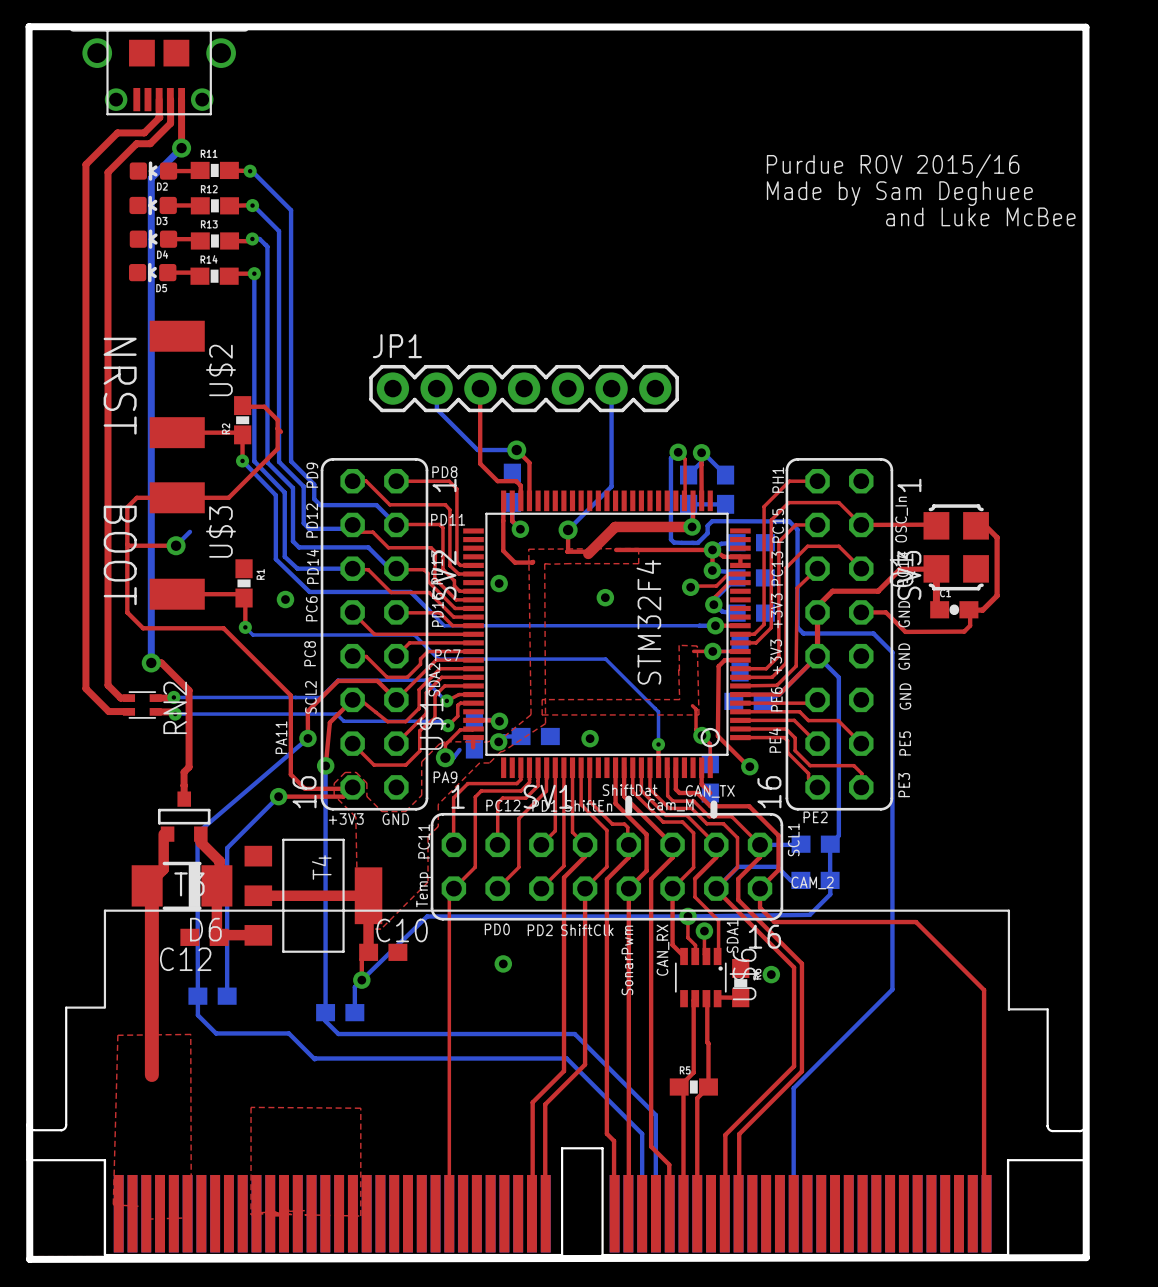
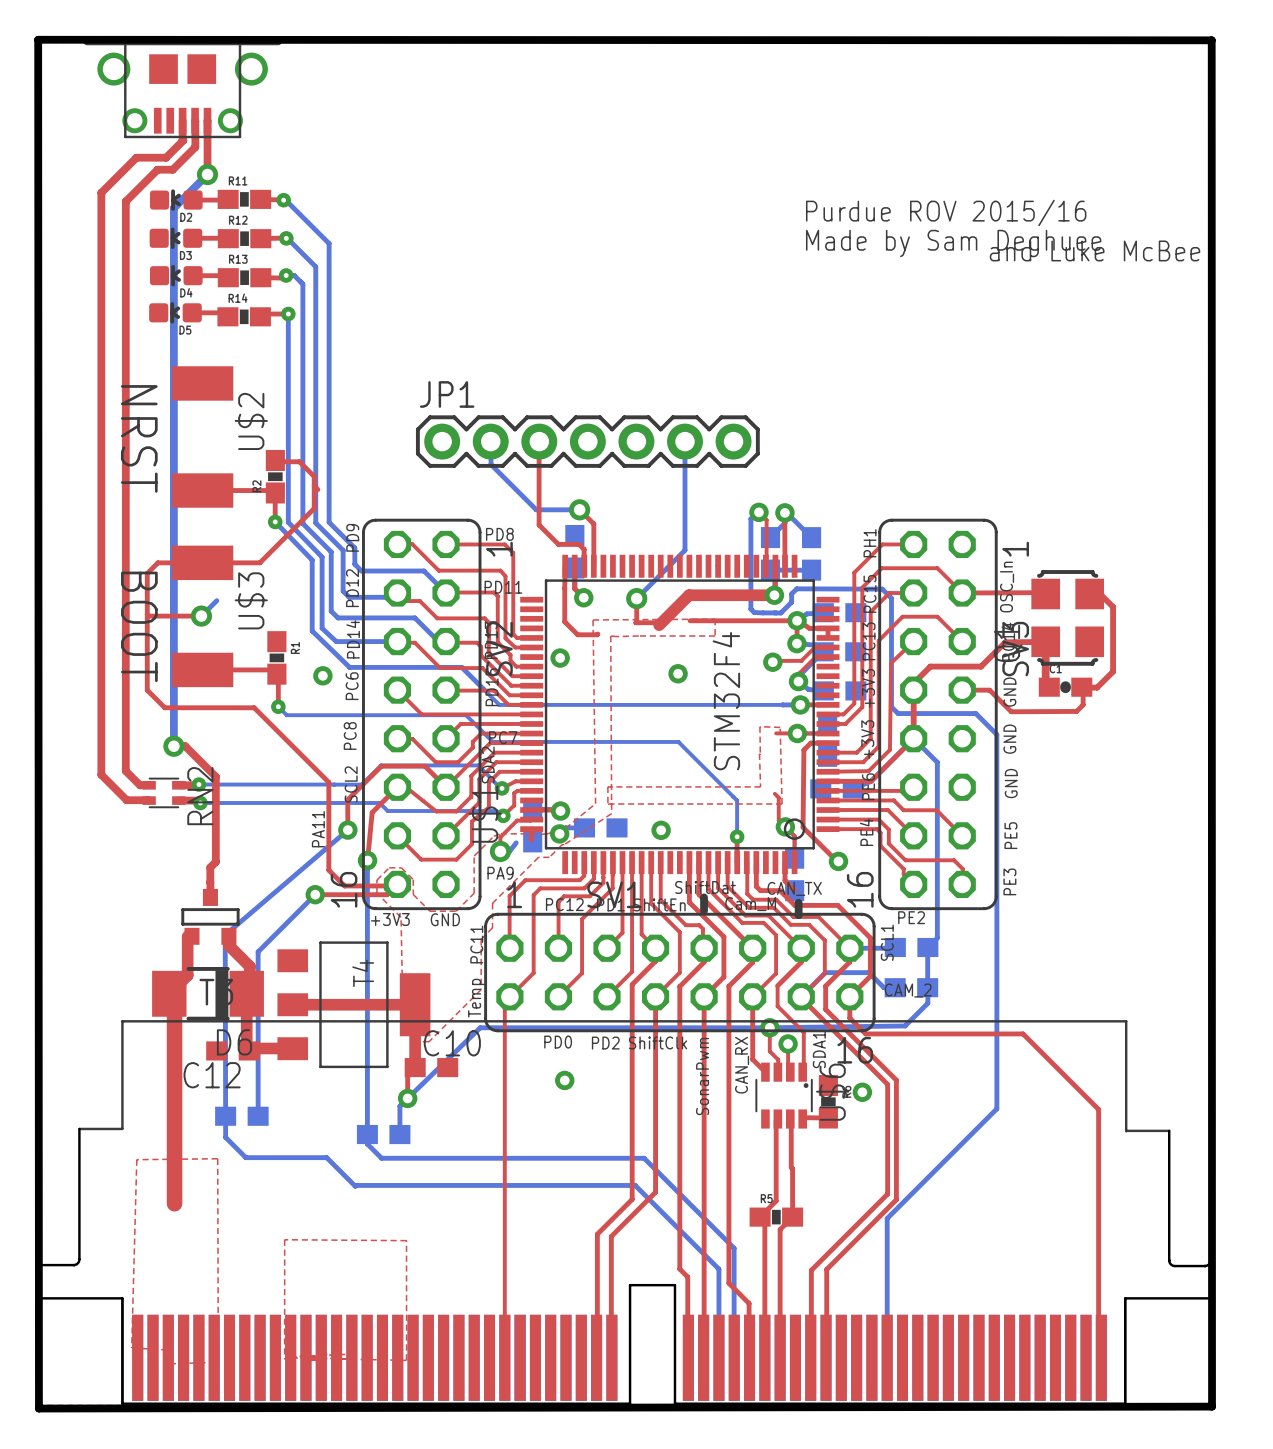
text position: Purdue ROV 2015/16 (893, 166) -> Purdue ROV 2015/16 (946, 212)
text position: Made by Sam Deghuee (899, 193) -> Made by Sam Deghuee (953, 243)

